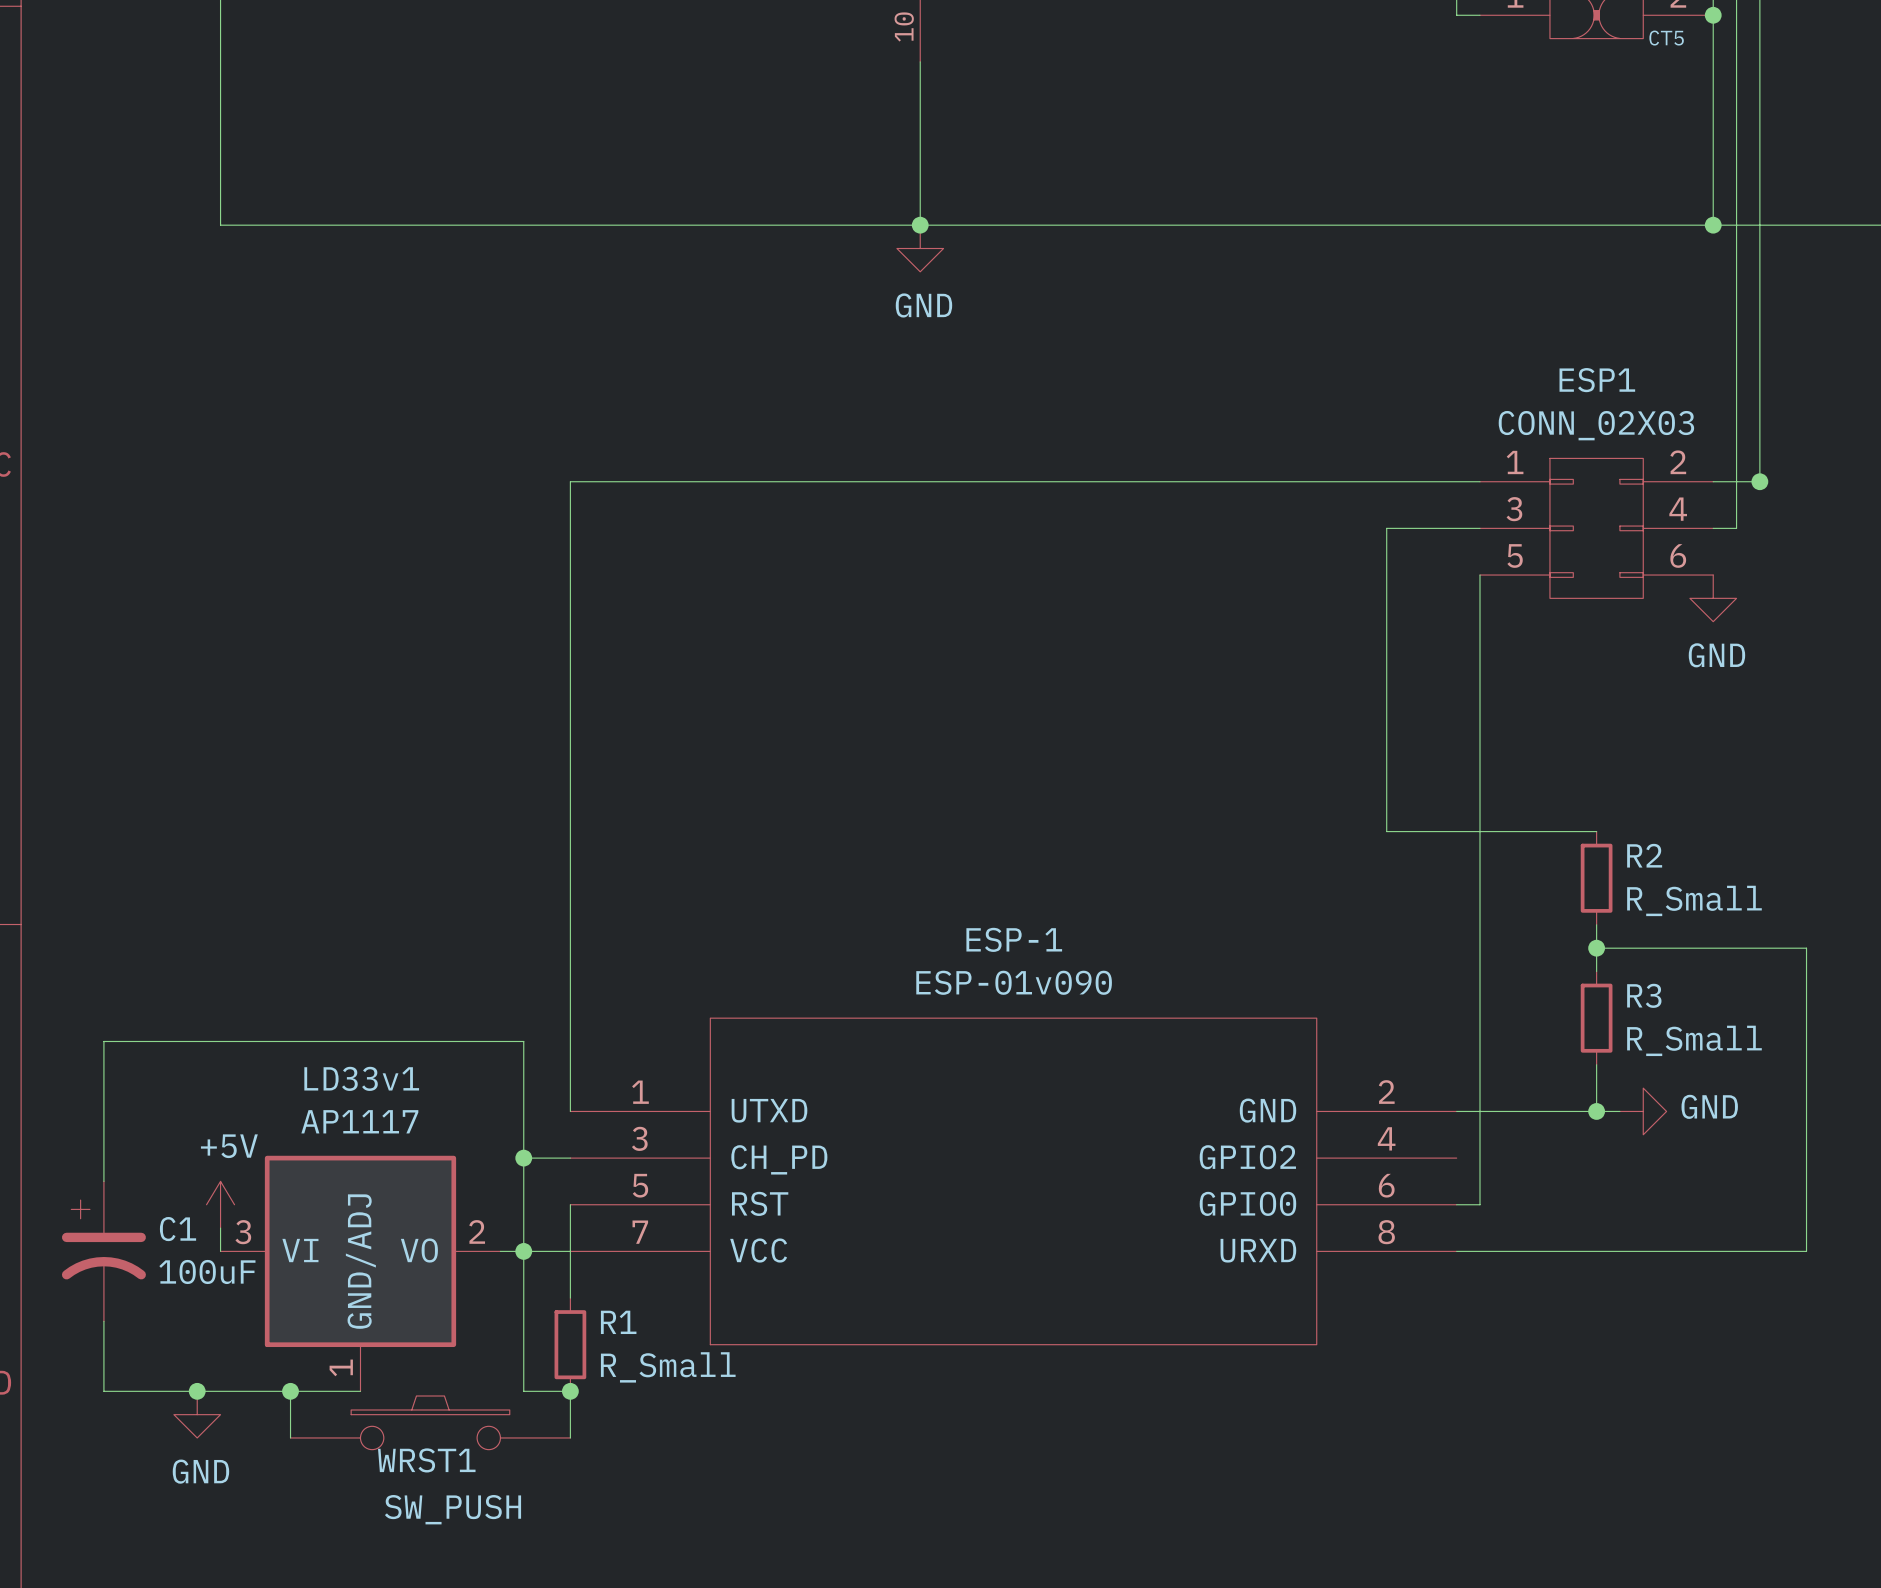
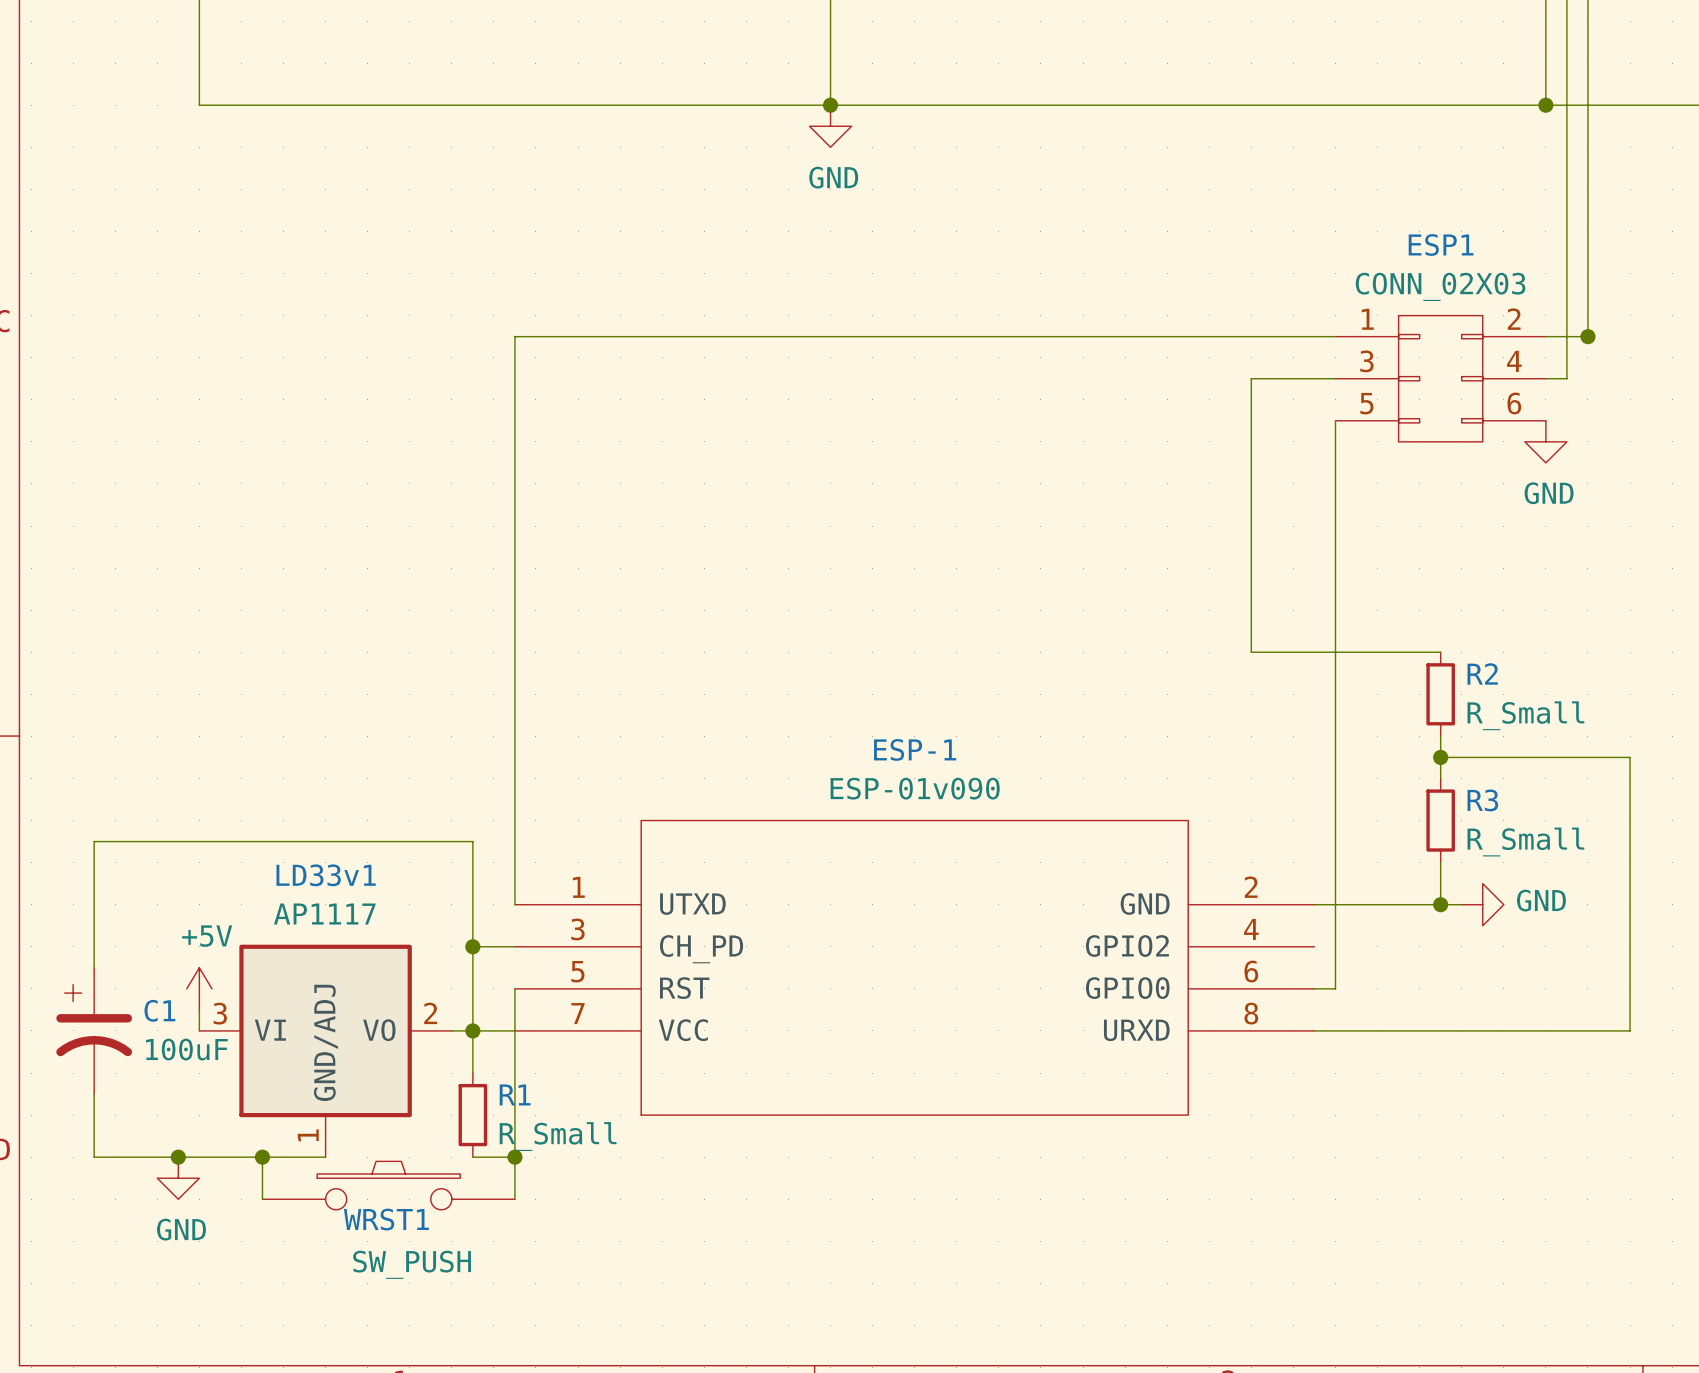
wire: (523, 1298) (523, 1391) -> (514, 1073) (514, 1157)
R1 position: (570, 1344) -> (472, 1115)

